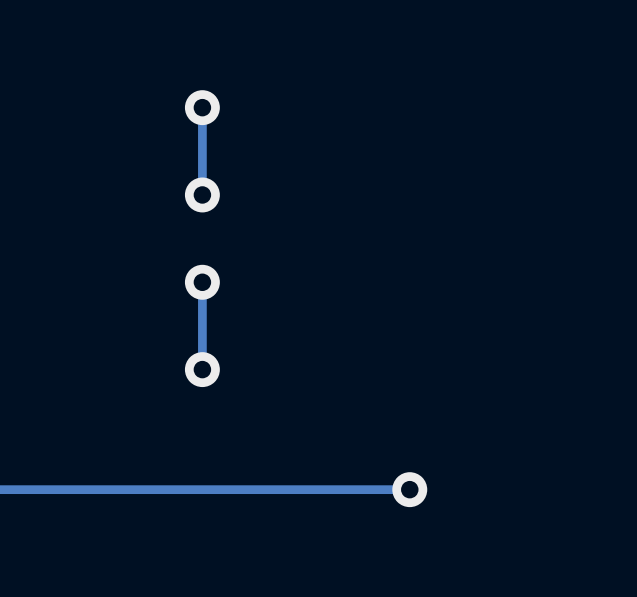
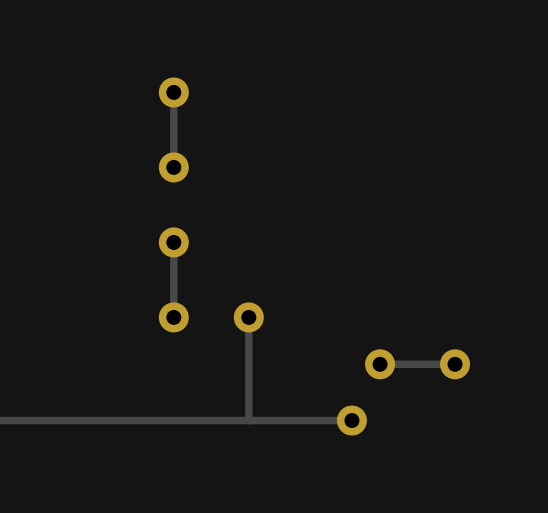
track: none -> (248, 317) (248, 420)
via: none -> (248, 317)
via: none -> (380, 364)
track: none -> (455, 364) (380, 364)
via: none -> (455, 364)

